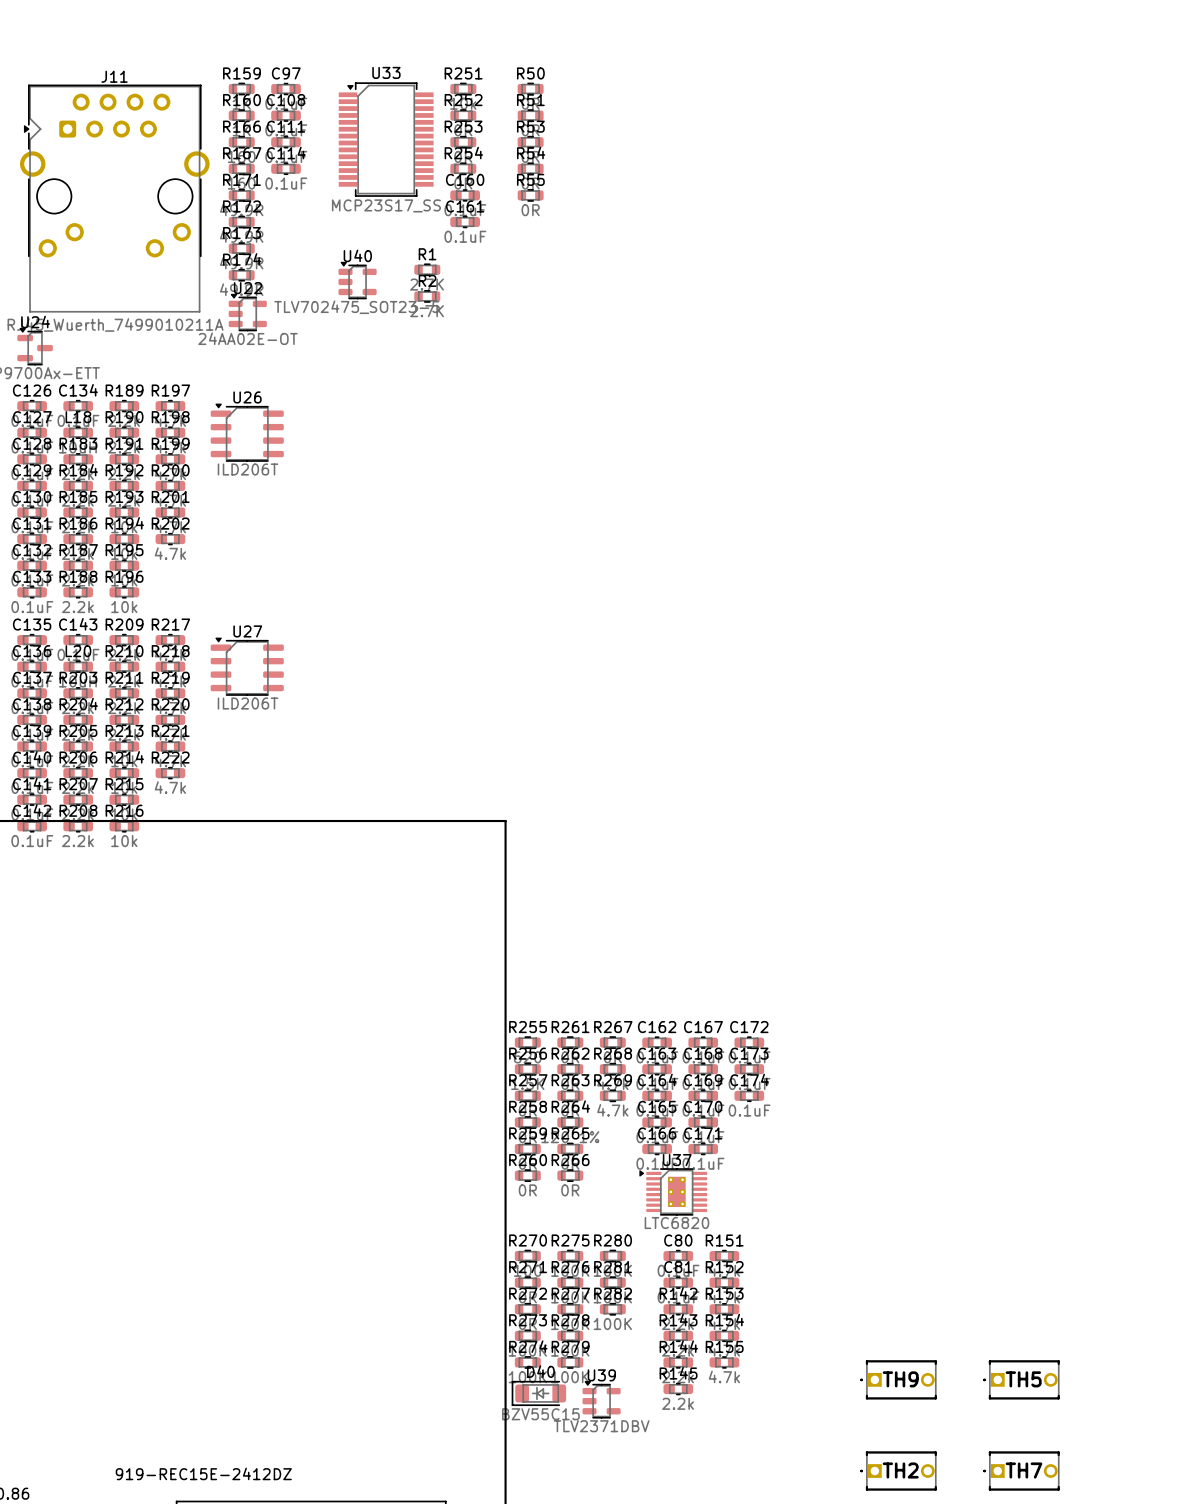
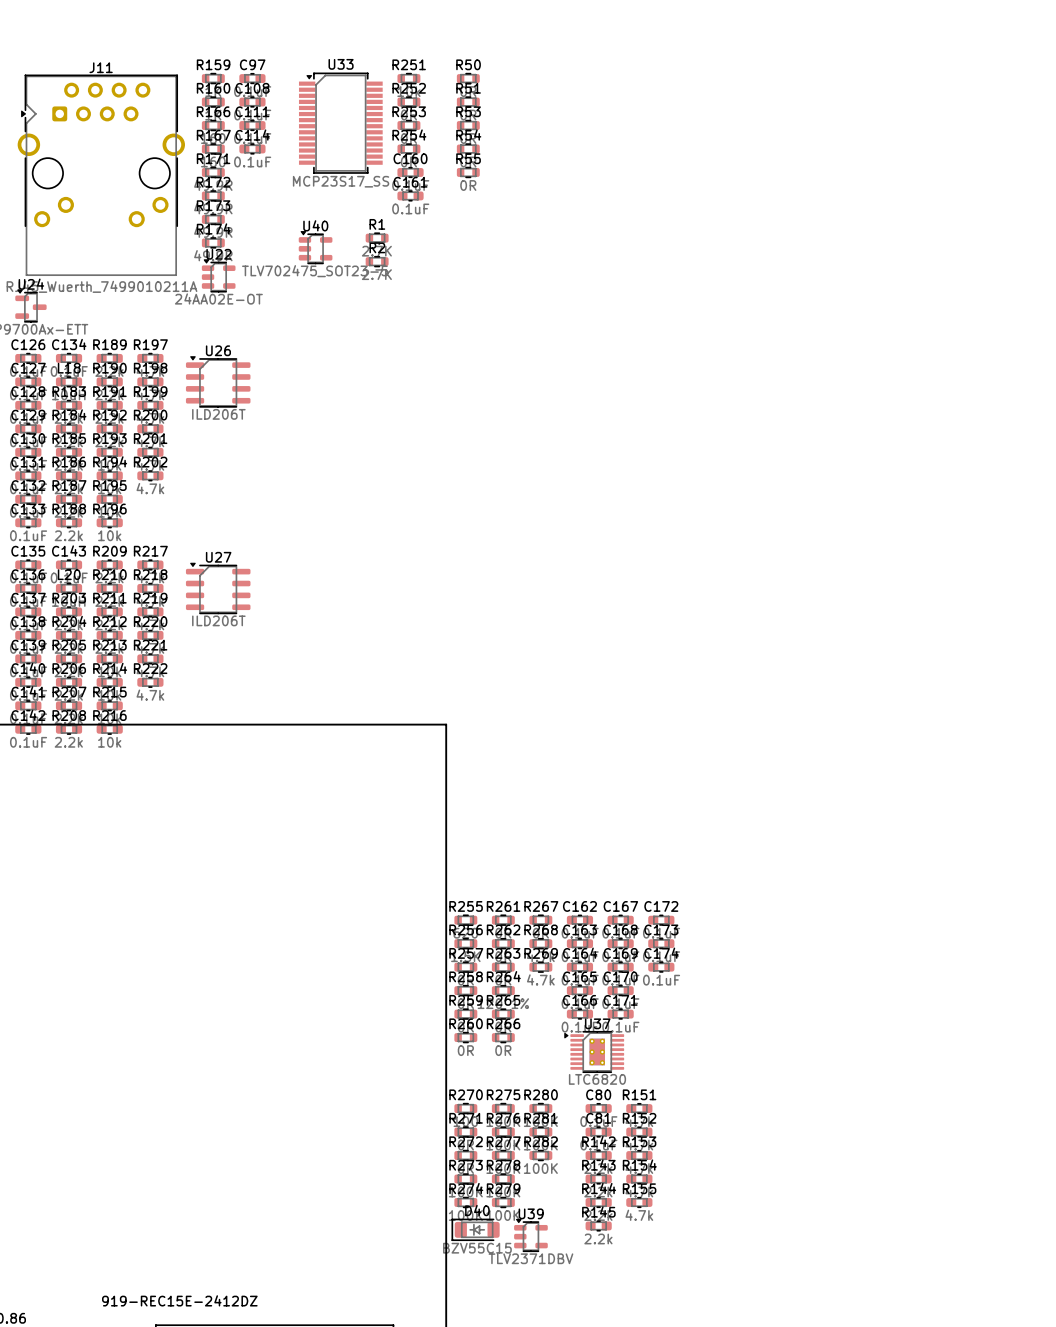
TH9: (898, 1379) -> none
TH5: (1021, 1379) -> none
TH2: (898, 1471) -> none
TH7: (1021, 1471) -> none

